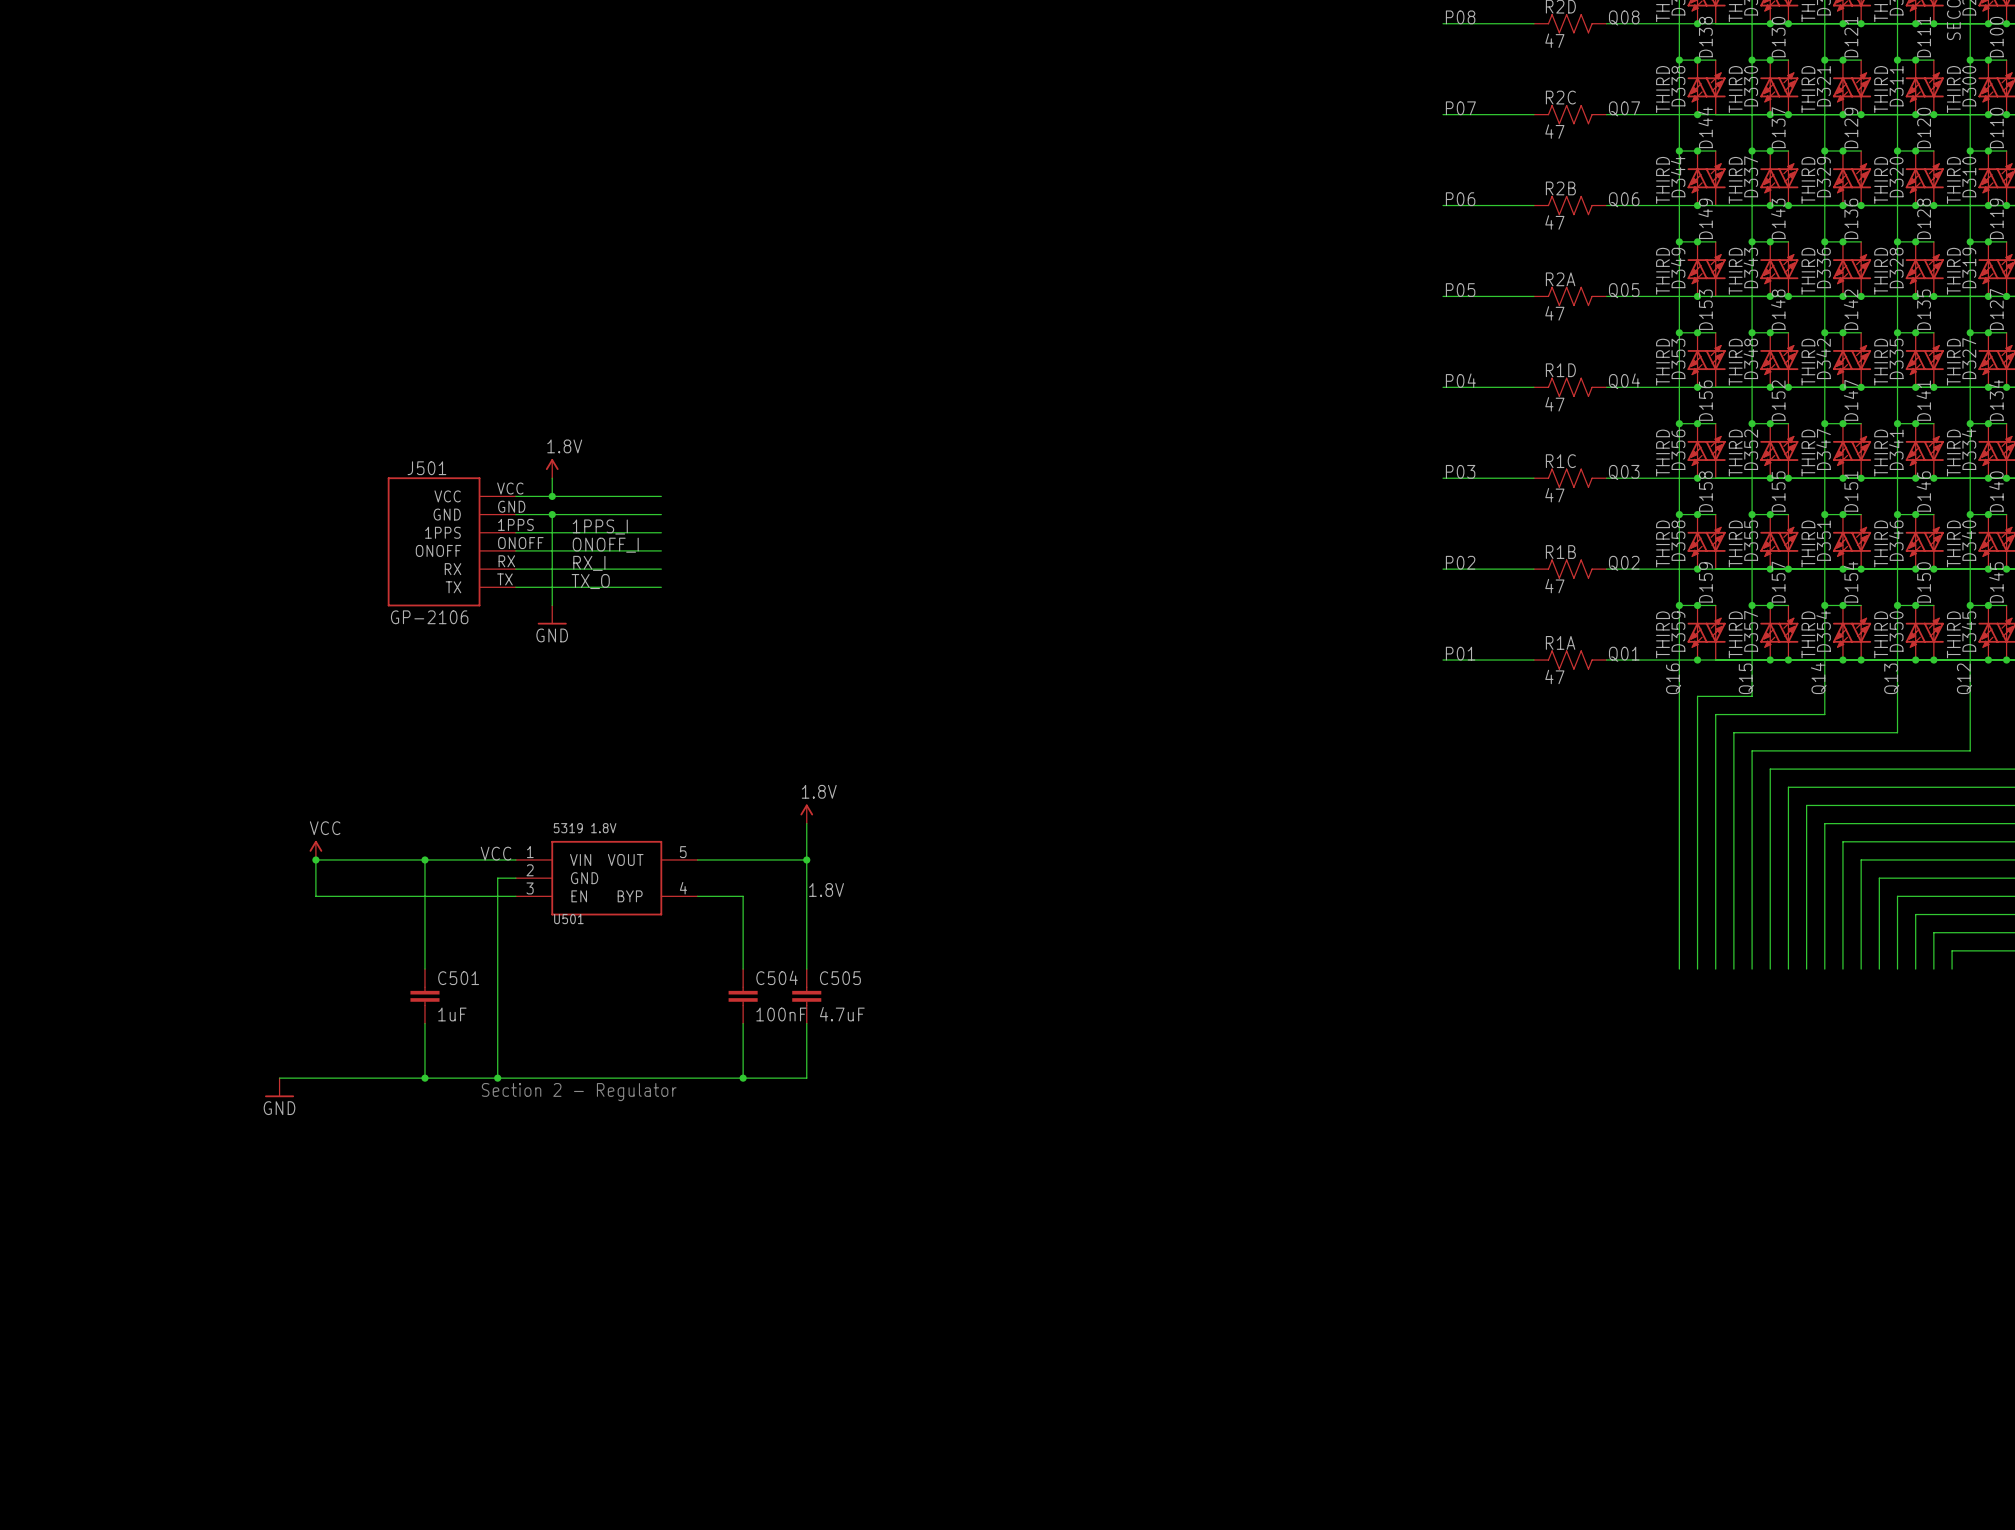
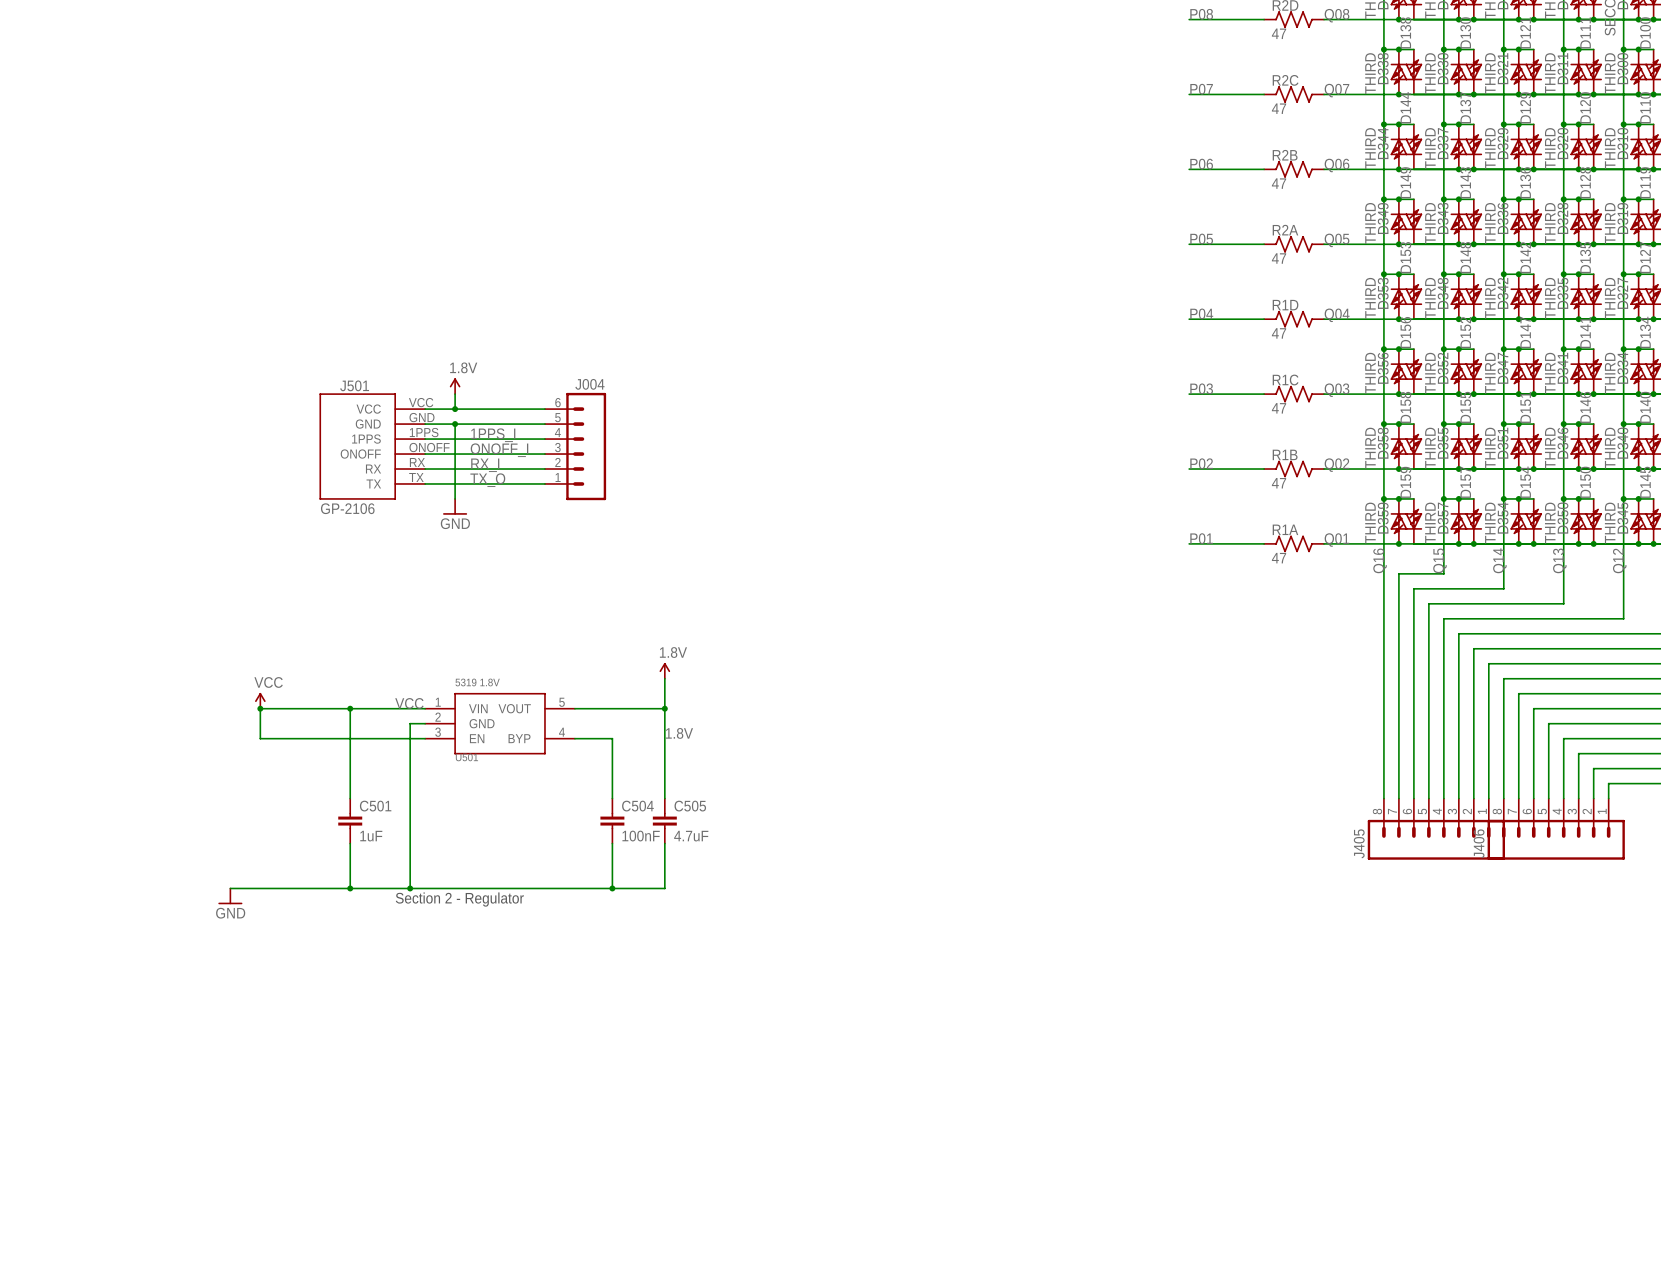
J004: none -> (575, 446)
J405: none -> (1436, 829)
J406: none -> (1556, 829)

